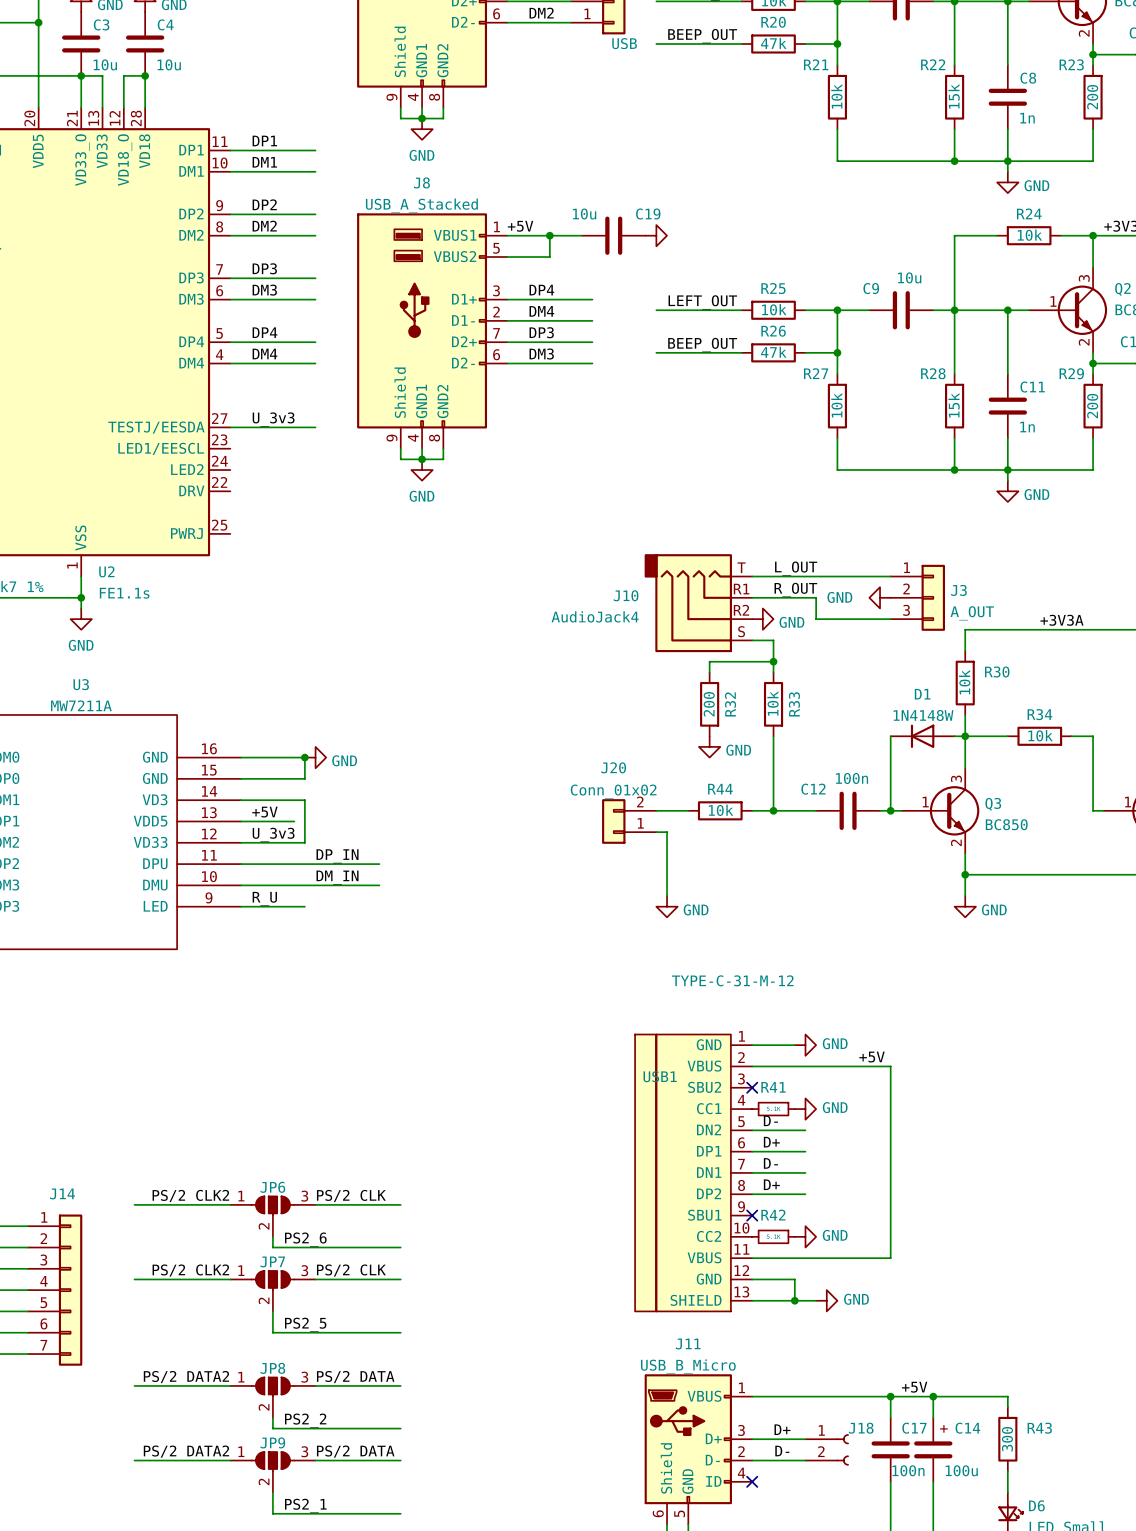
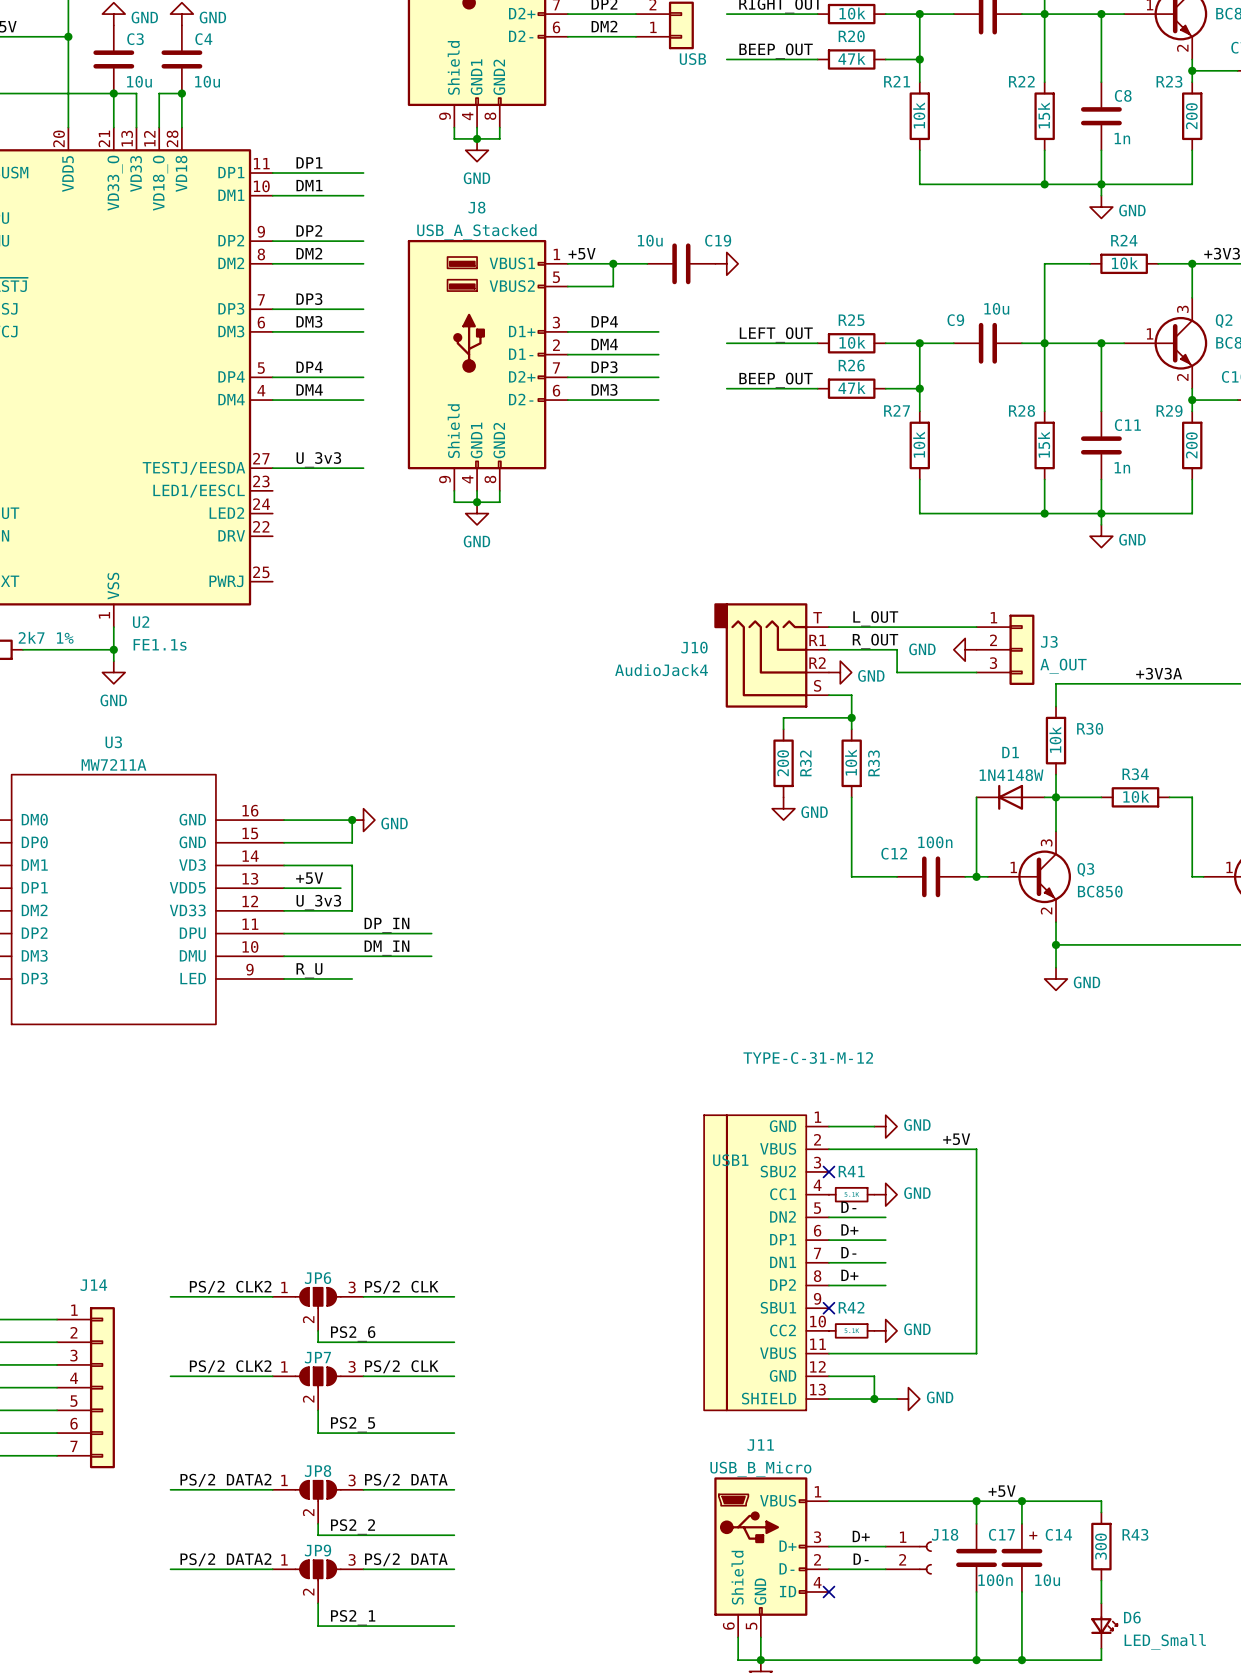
wire: (656, 810) (688, 810) -> none
R44: 10k (720, 810) -> none
wire: (752, 810) (773, 810) -> none
junction: (773, 810) -> none
J20: Conn_01x02 (629, 821) -> none
wire: (656, 832) (667, 832) (667, 896) -> none
power symbol: GND (667, 906) -> none
C14 value: 100u (961, 1470) -> 10u (1047, 1580)

